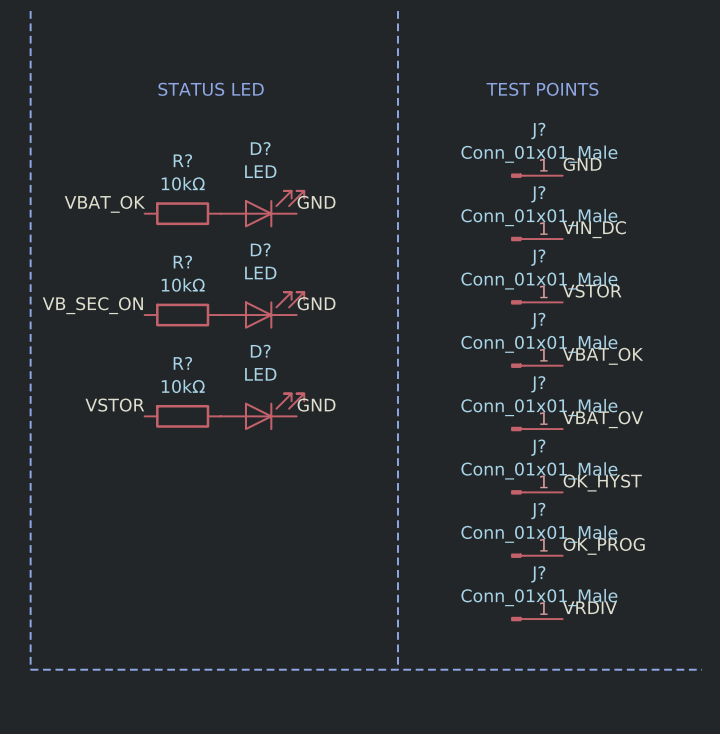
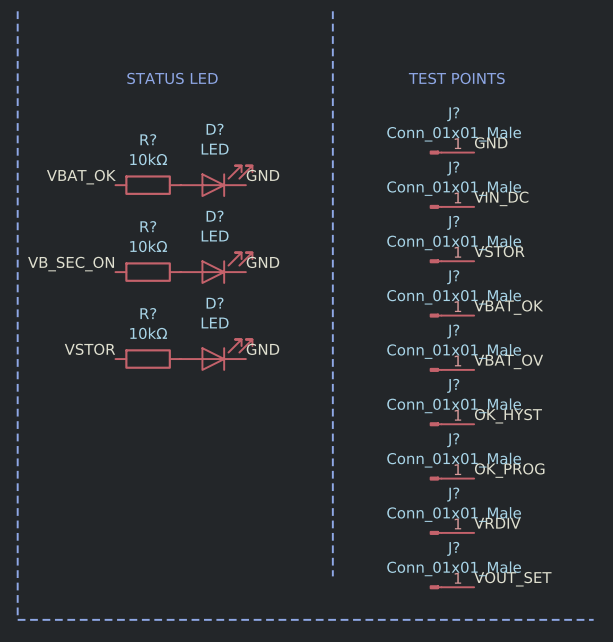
line: (30, 669) (702, 669) -> (17, 576) (17, 619) (593, 619)
label: none -> VOUT_SET (512, 579)
J?: none -> Conn_01x01_Male (452, 587)

